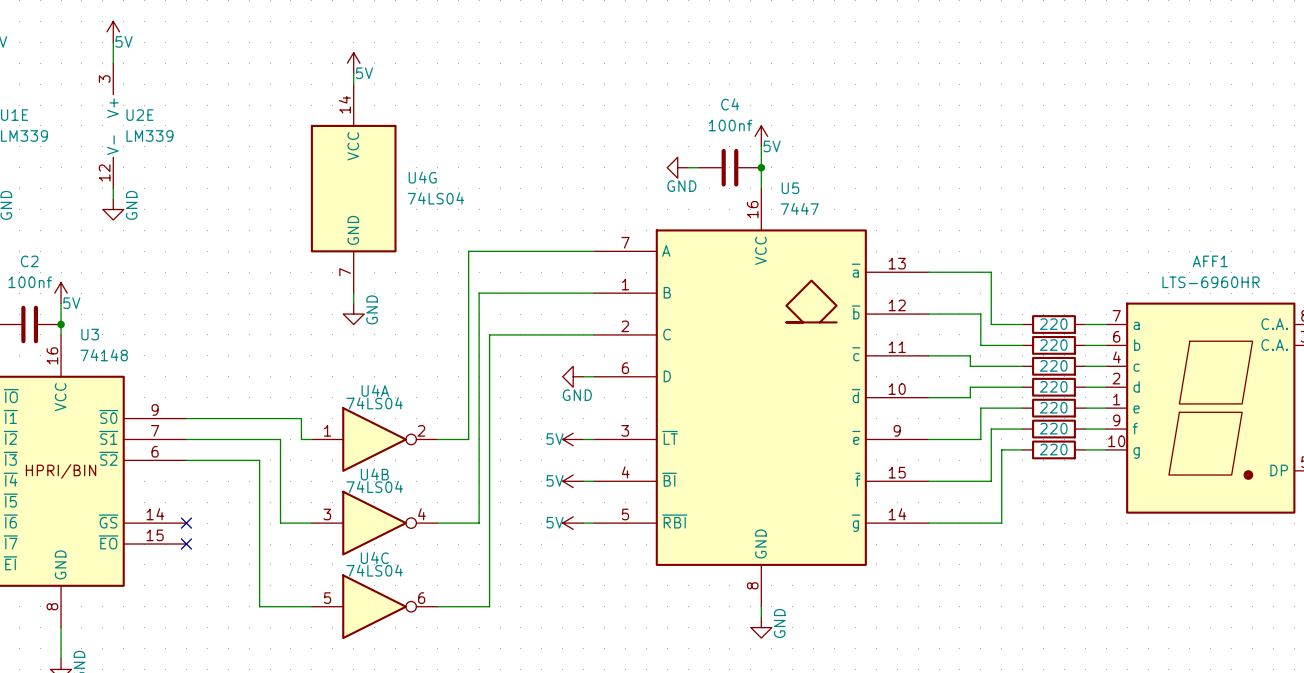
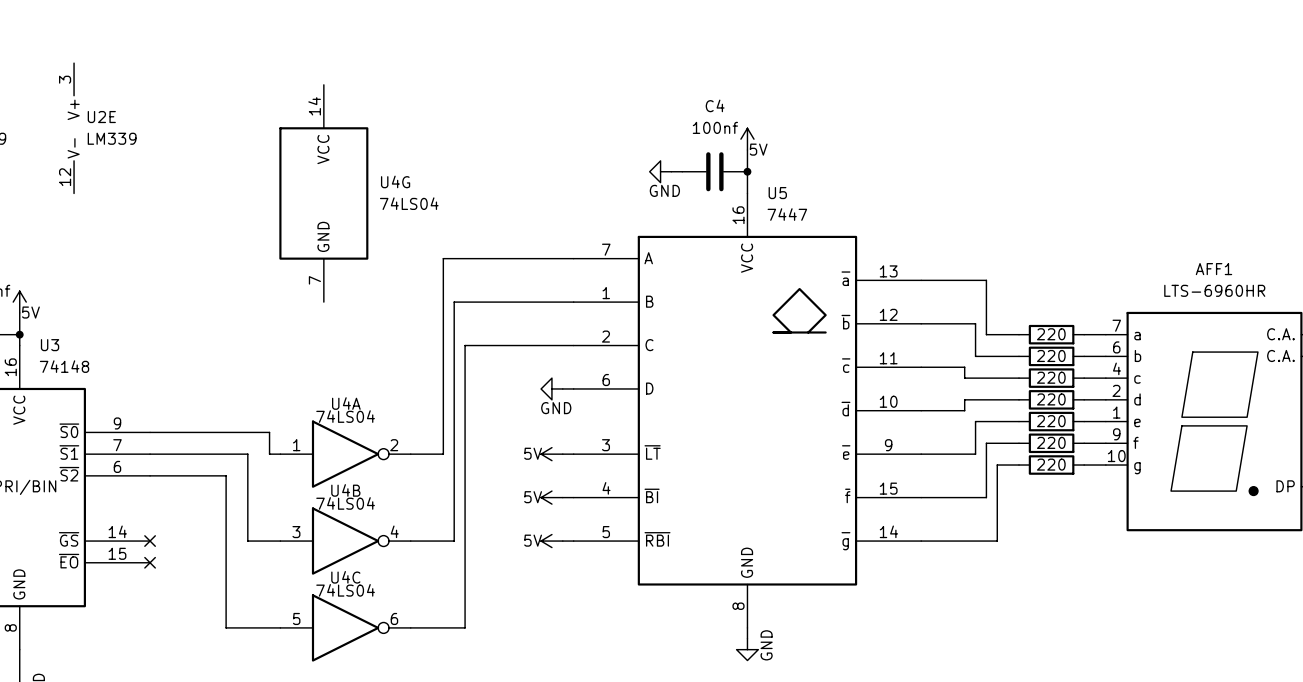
power symbol: 5V (113, 31) -> none
wire: (113, 42) (113, 63) -> none
power symbol: 5V (353, 63) -> none
wire: (353, 73) (353, 84) -> none
wire: (113, 188) (113, 199) -> none
power symbol: GND (113, 209) -> none
wire: (353, 293) (353, 303) -> none
power symbol: GND (353, 314) -> none

